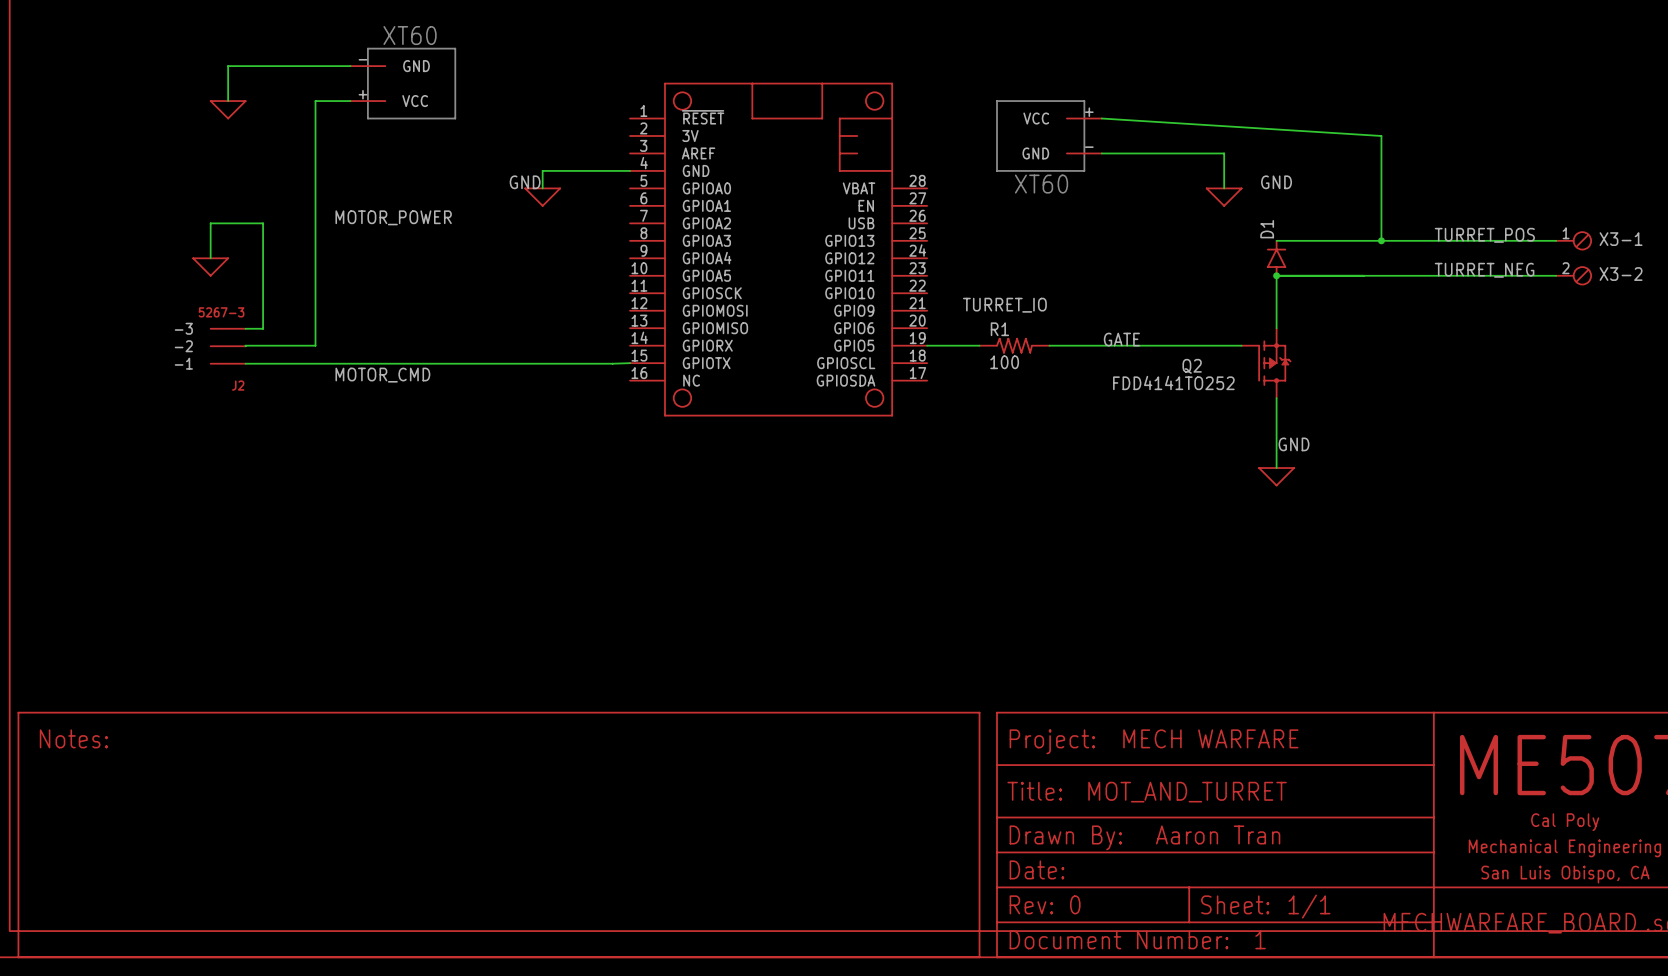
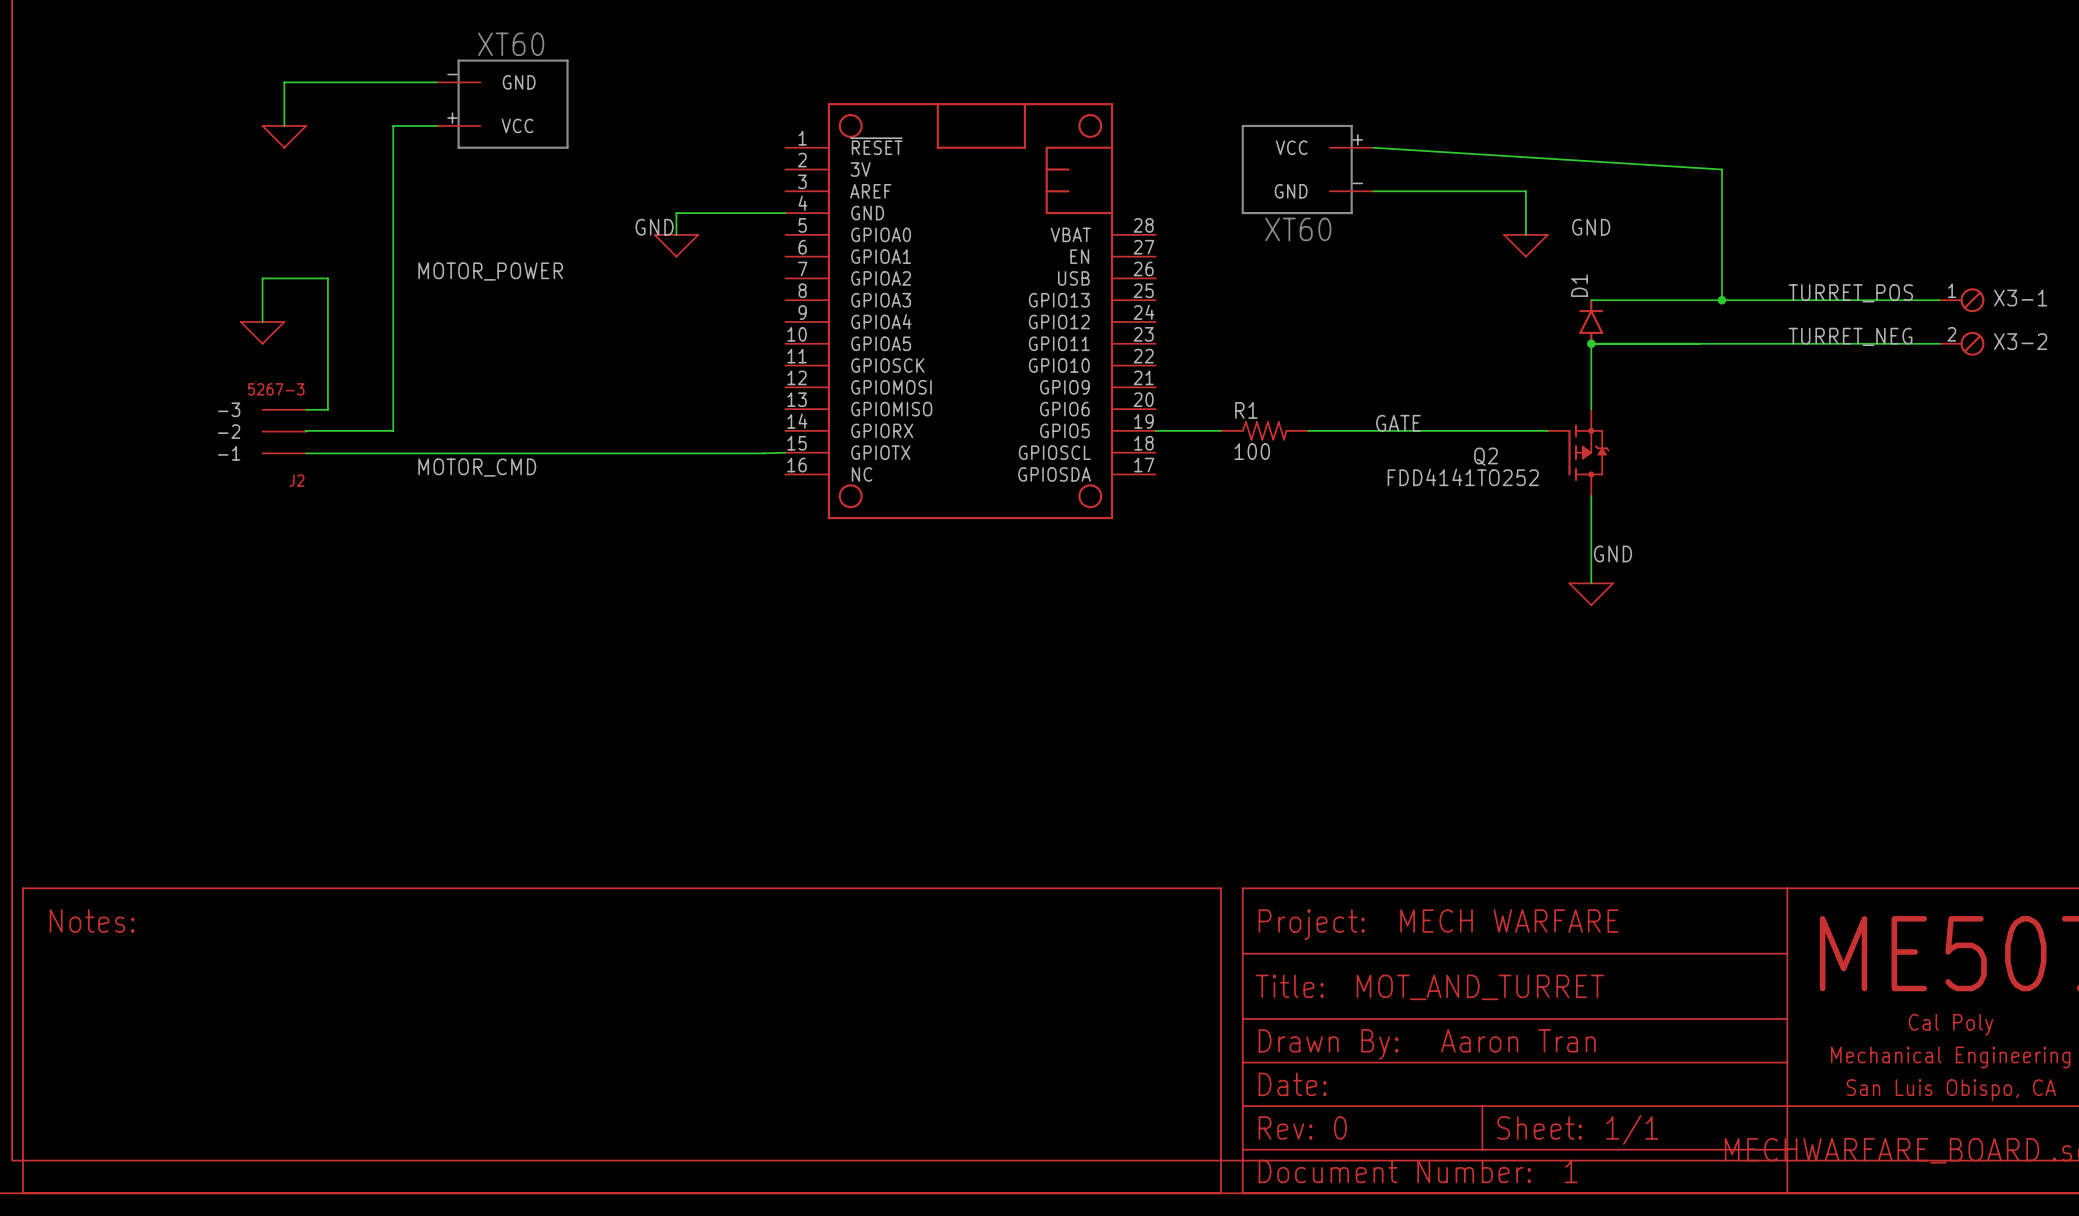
label: TURRET_IO (1004, 305) -> none

